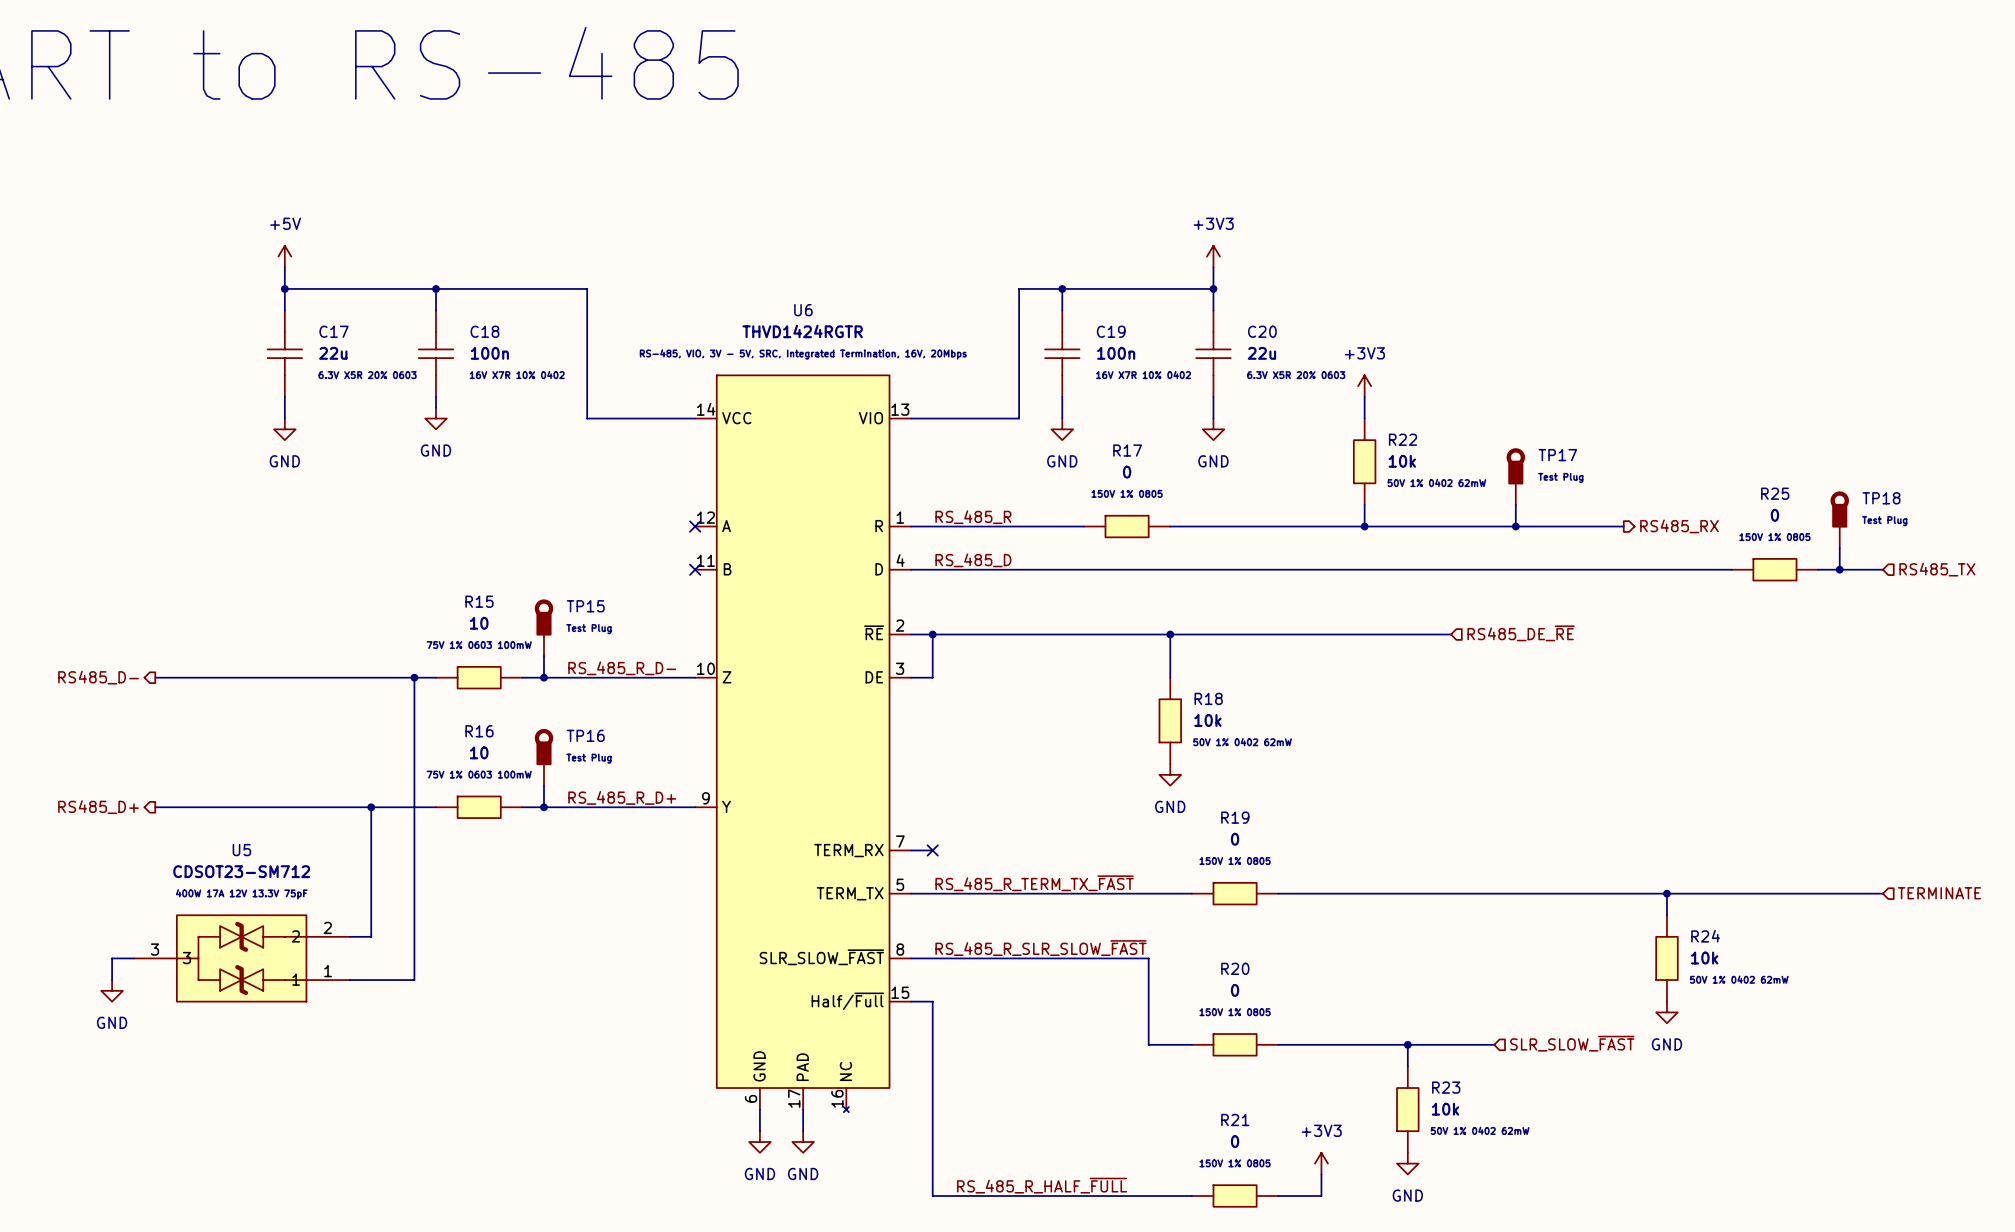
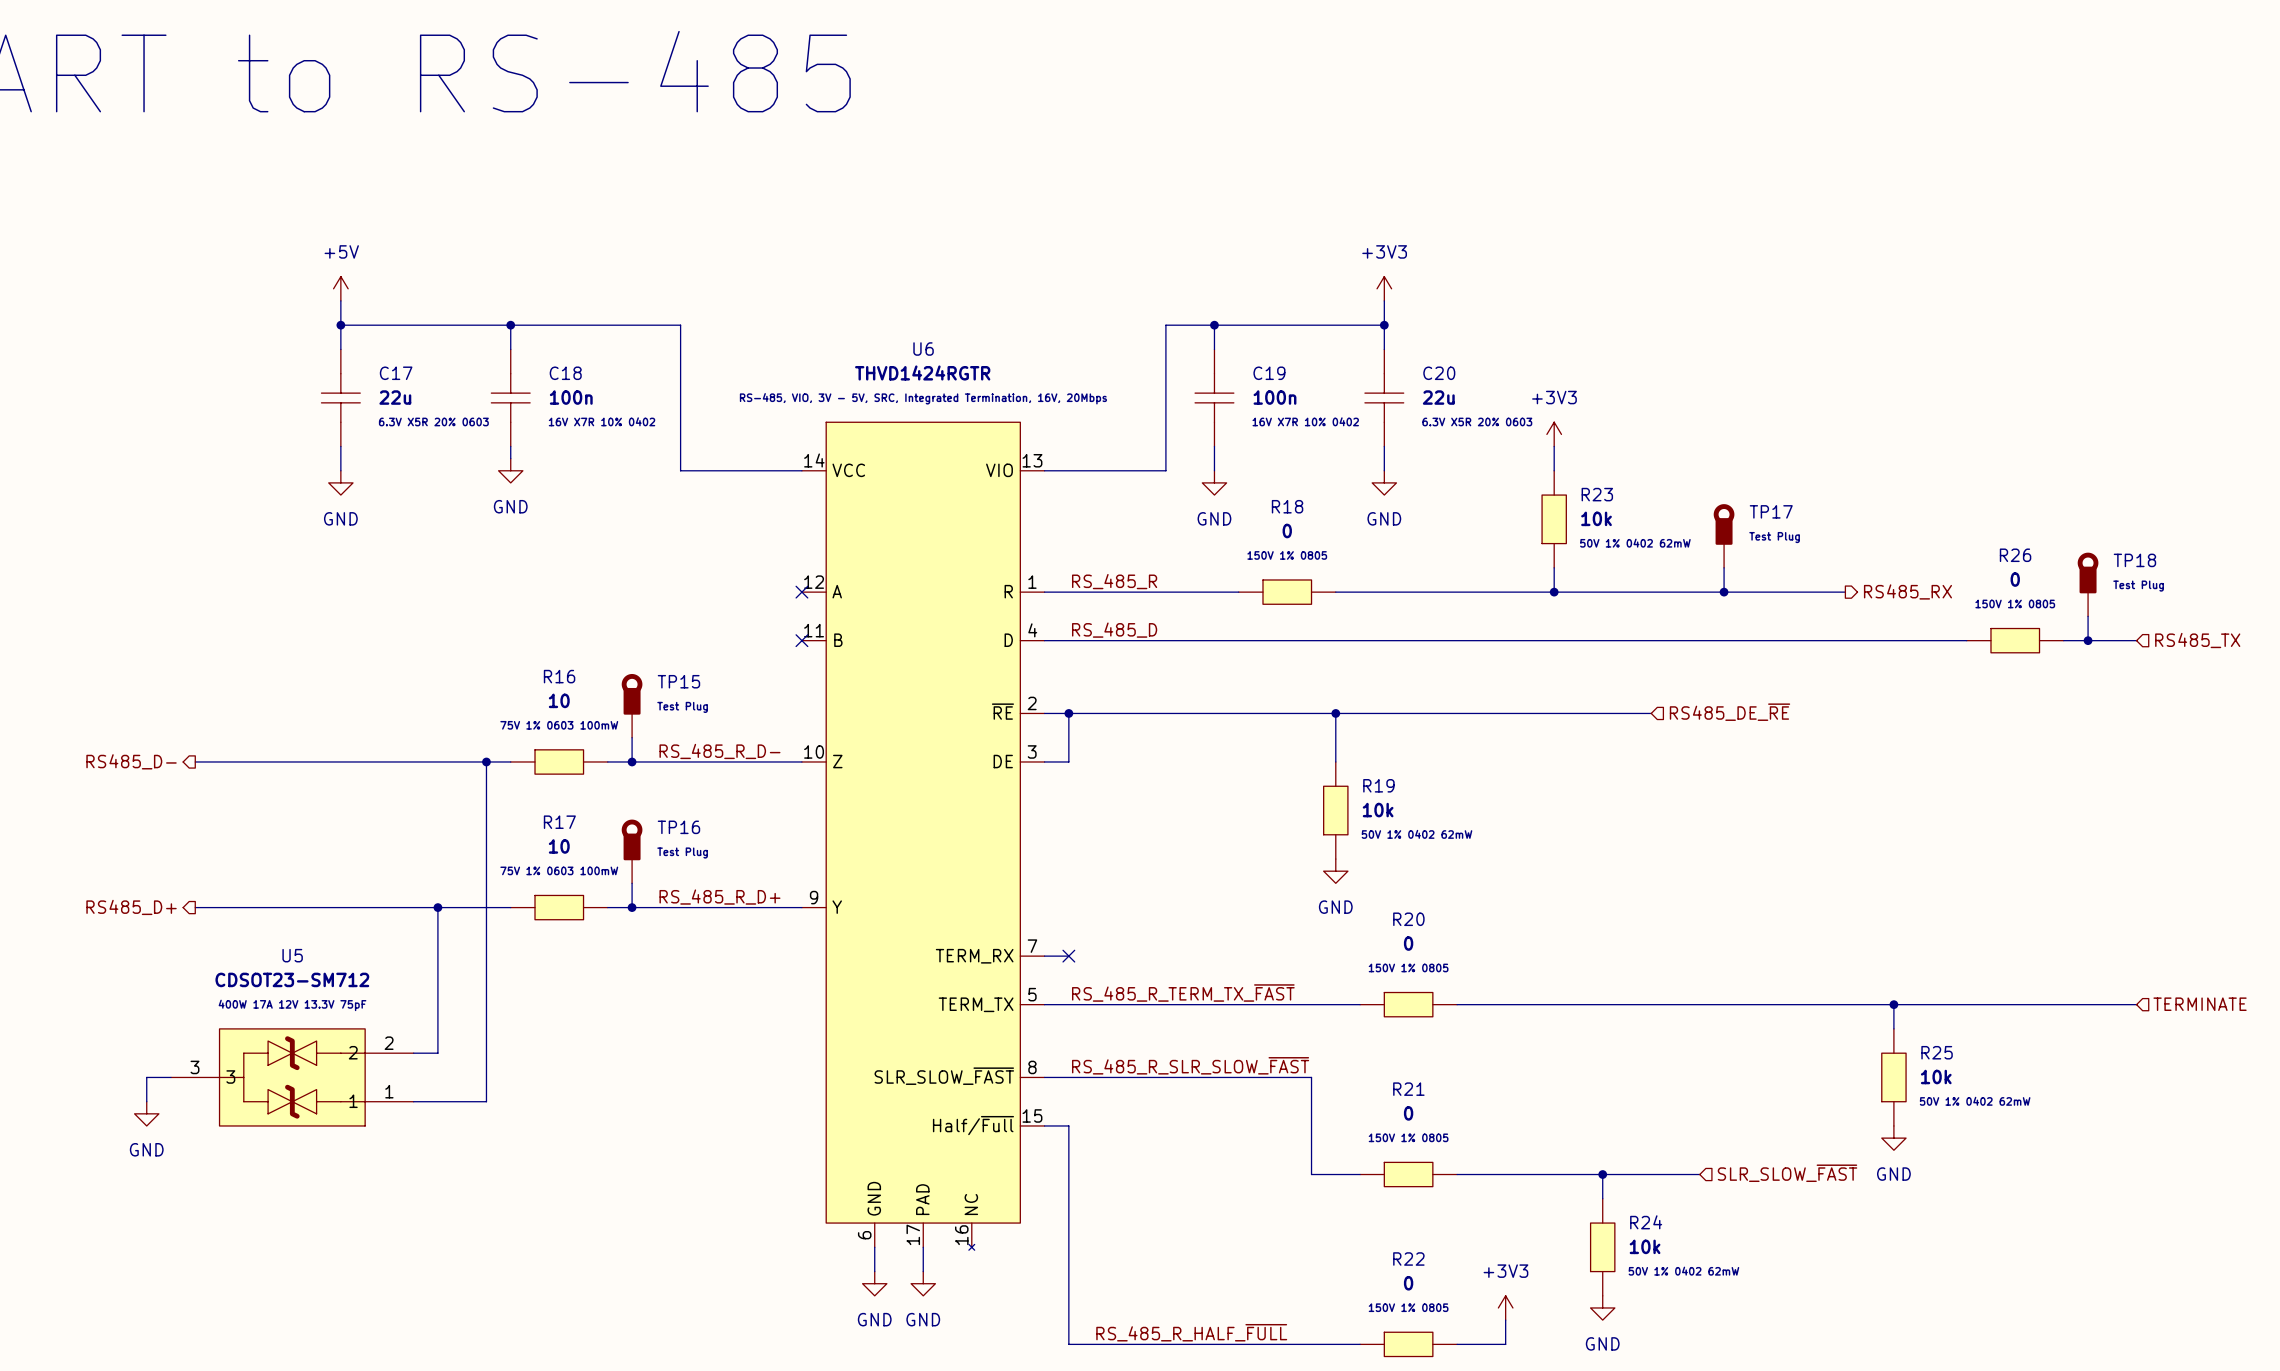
R22 name: R22 (1403, 439) -> R23 (1597, 494)
R17 name: R17 (1127, 450) -> R18 (1287, 506)
R25 name: R25 (1775, 493) -> R26 (2015, 555)
R15 name: R15 (479, 601) -> R16 (559, 676)
R18 name: R18 (1208, 698) -> R19 (1378, 785)
R16 name: R16 (479, 731) -> R17 (559, 822)
R19 name: R19 (1235, 817) -> R20 (1408, 919)
R24 name: R24 (1705, 936) -> R25 (1937, 1052)
R20 name: R20 (1235, 968) -> R21 (1408, 1089)
R23 name: R23 (1446, 1087) -> R24 (1646, 1222)
R21 name: R21 (1235, 1120) -> R22 (1408, 1258)

